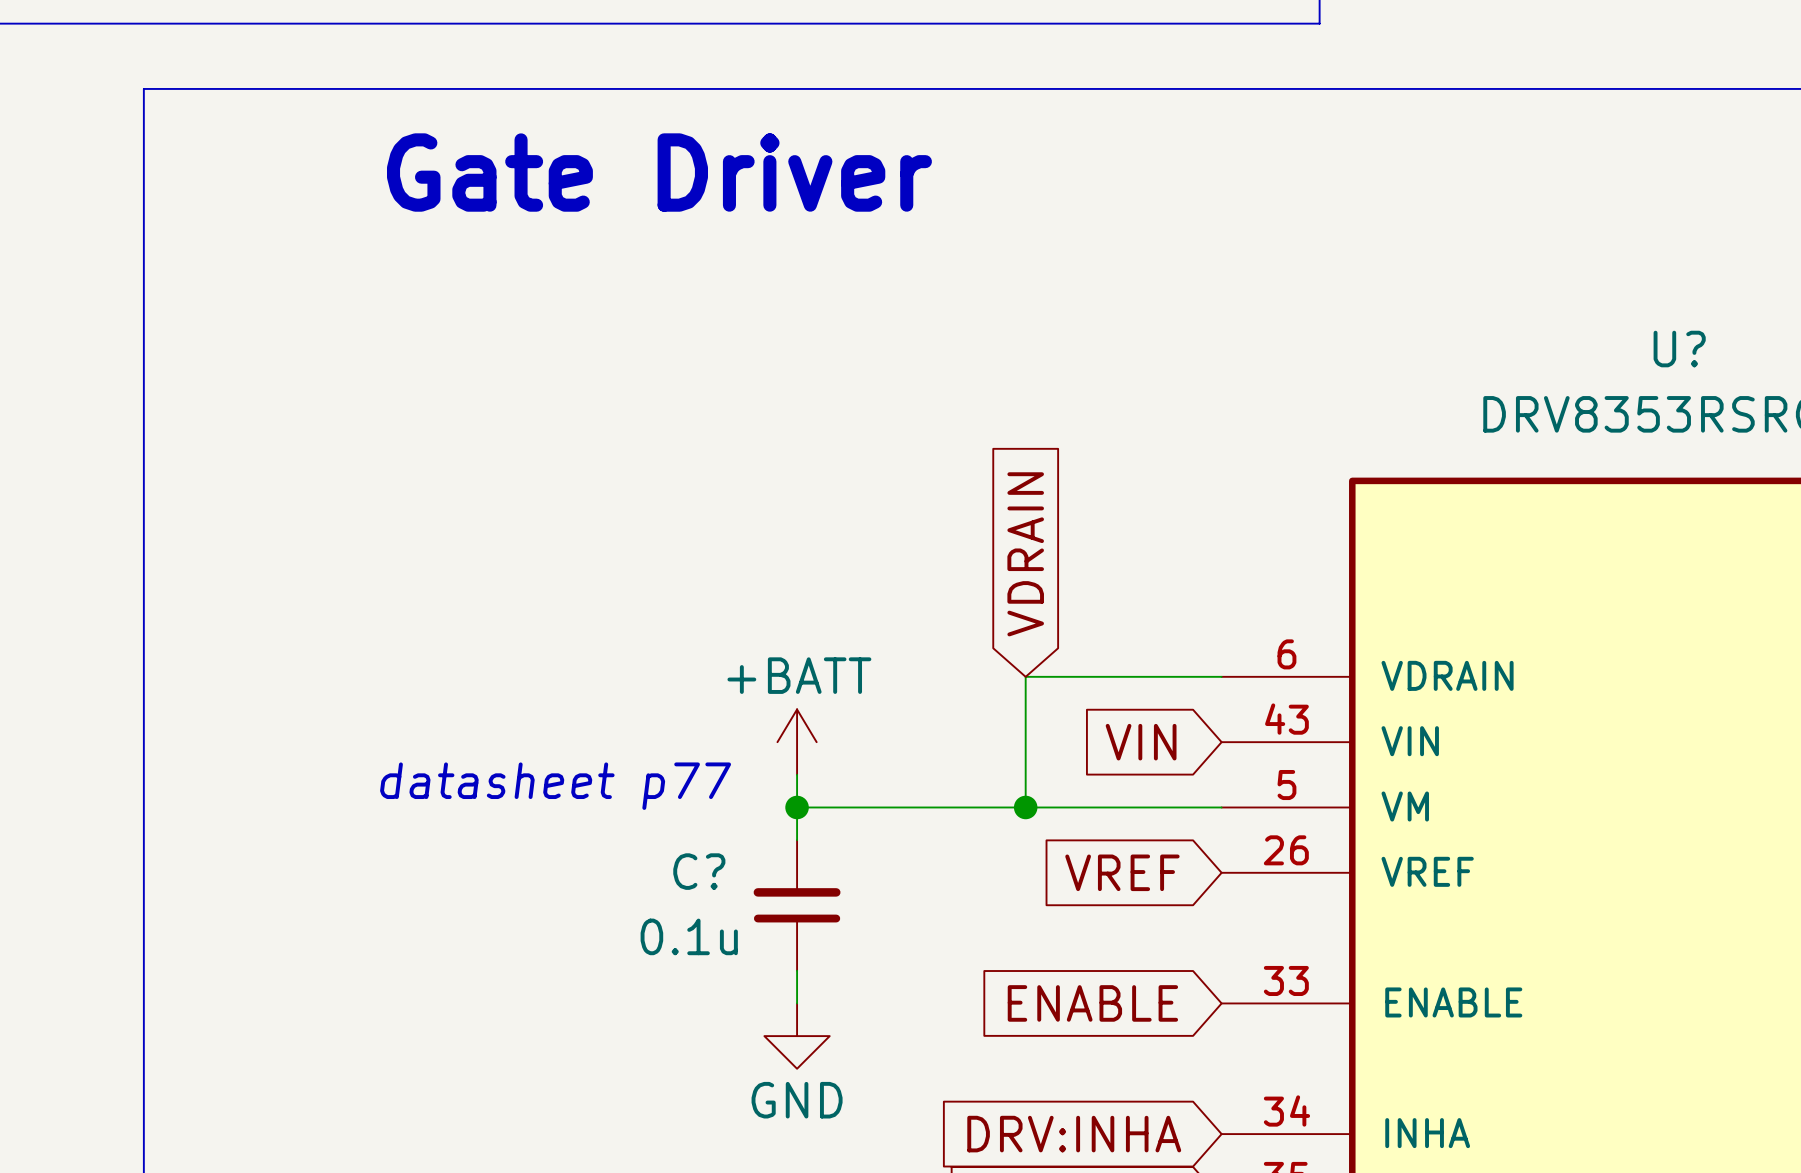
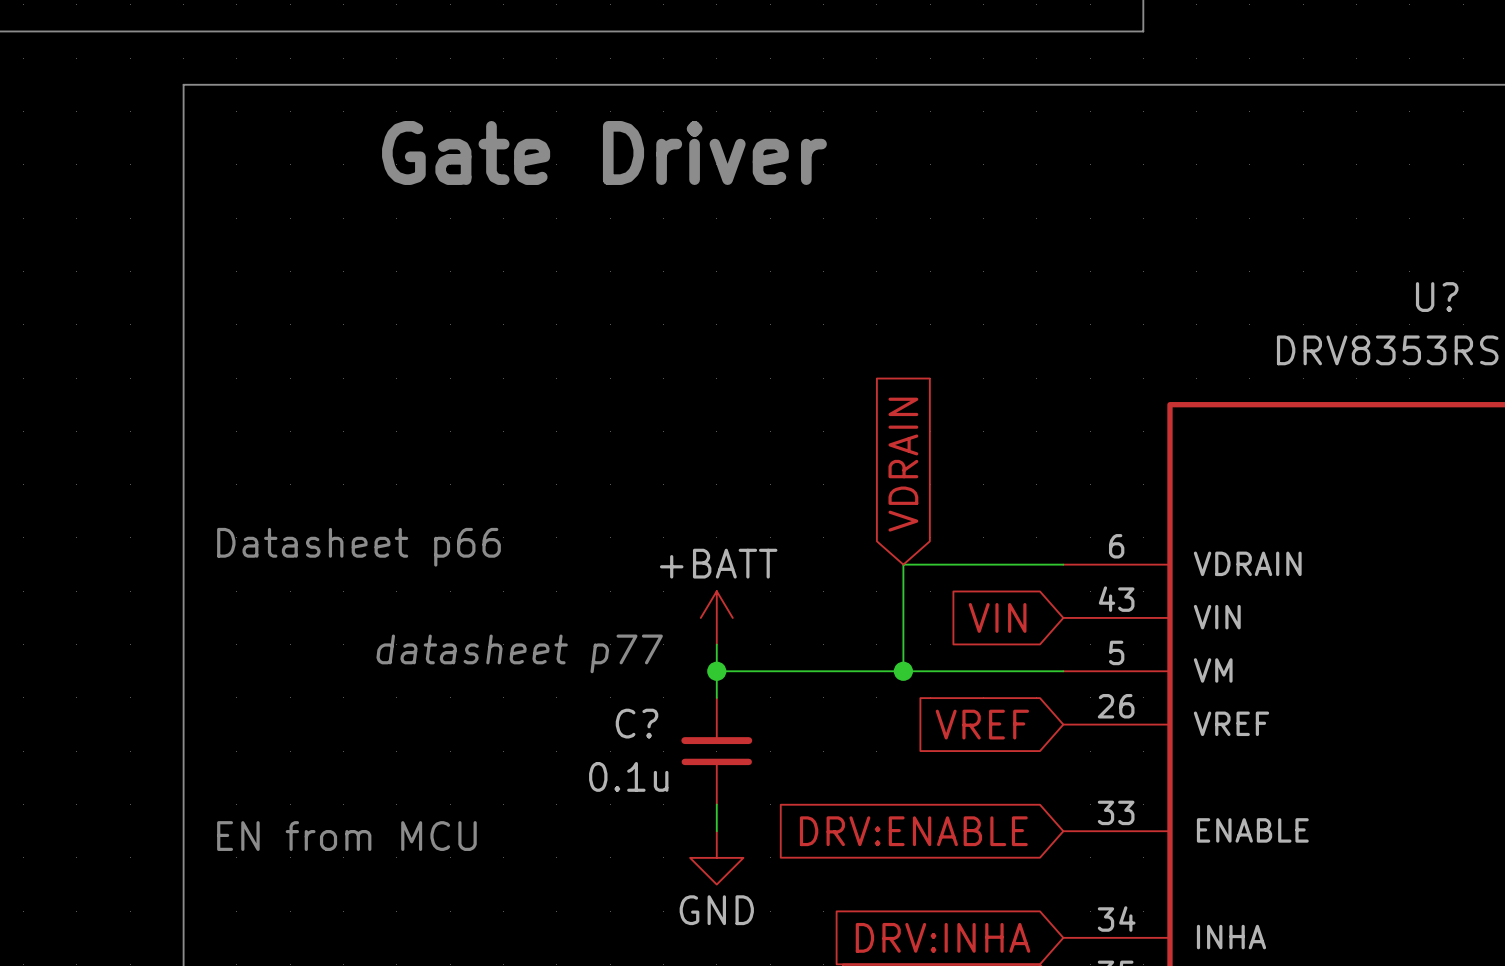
text: none -> Datasheet p66 (358, 547)
global label: ENABLE (1092, 1003) -> DRV:ENABLE (913, 831)
text: none -> EN from MCU (346, 836)

